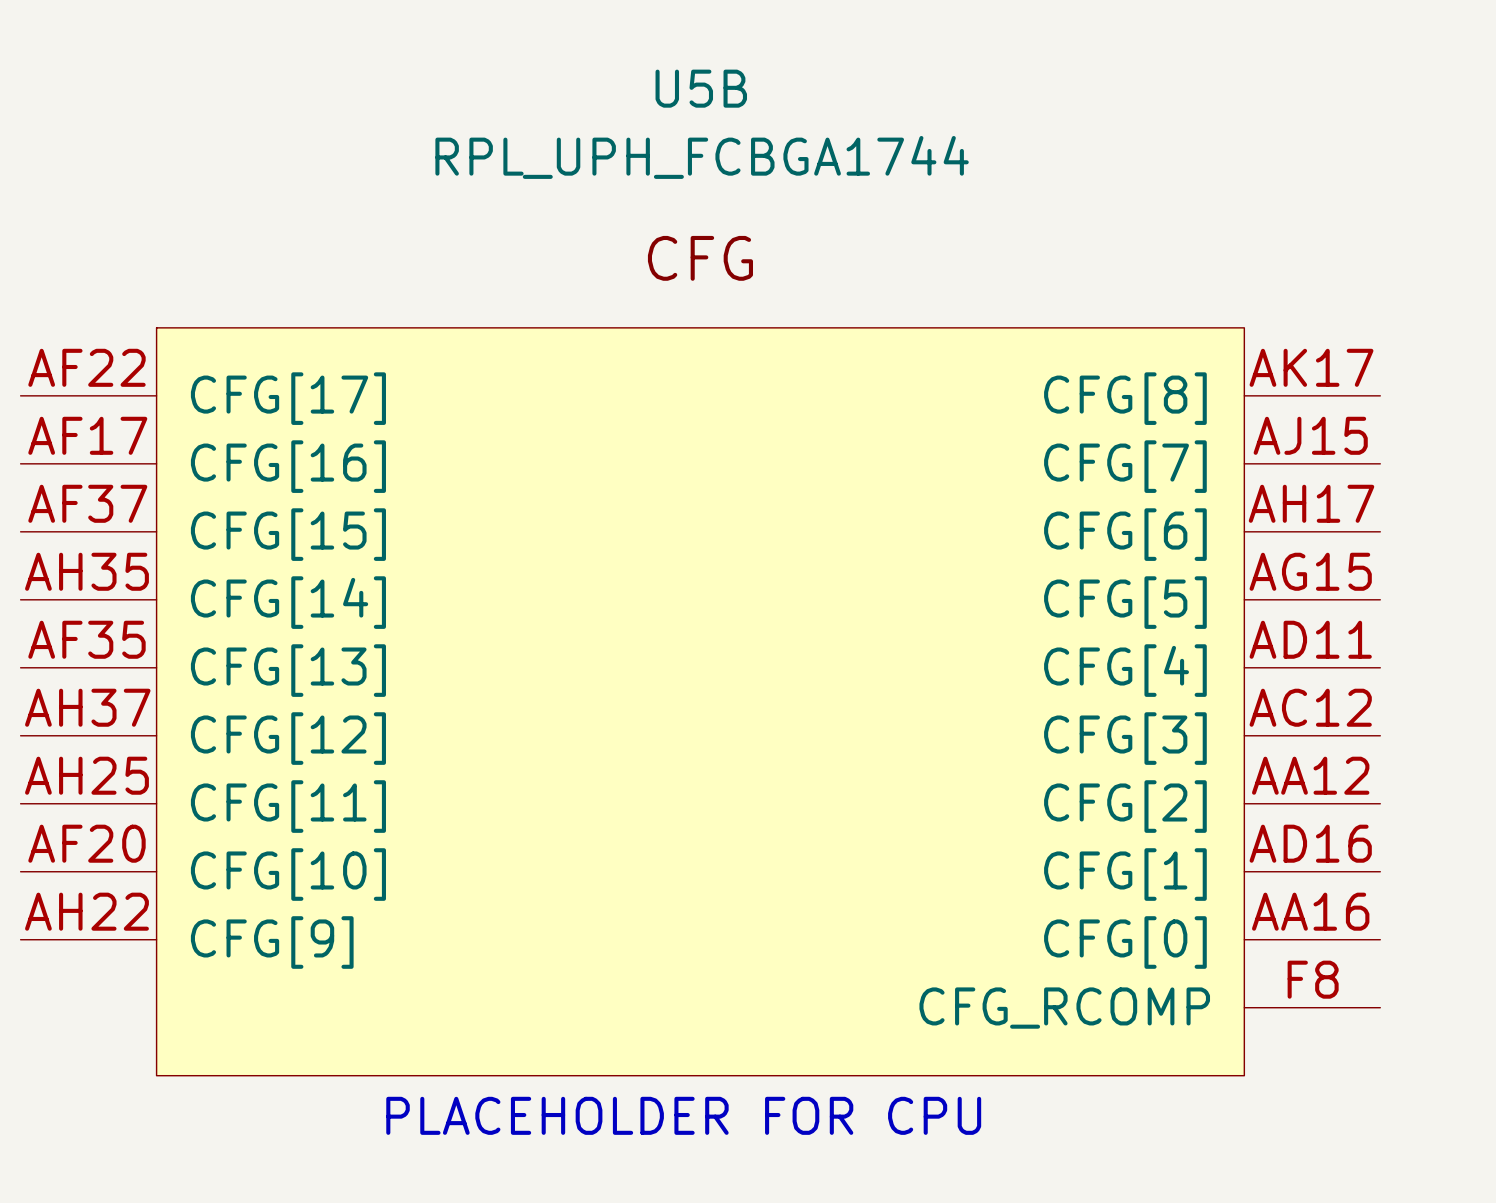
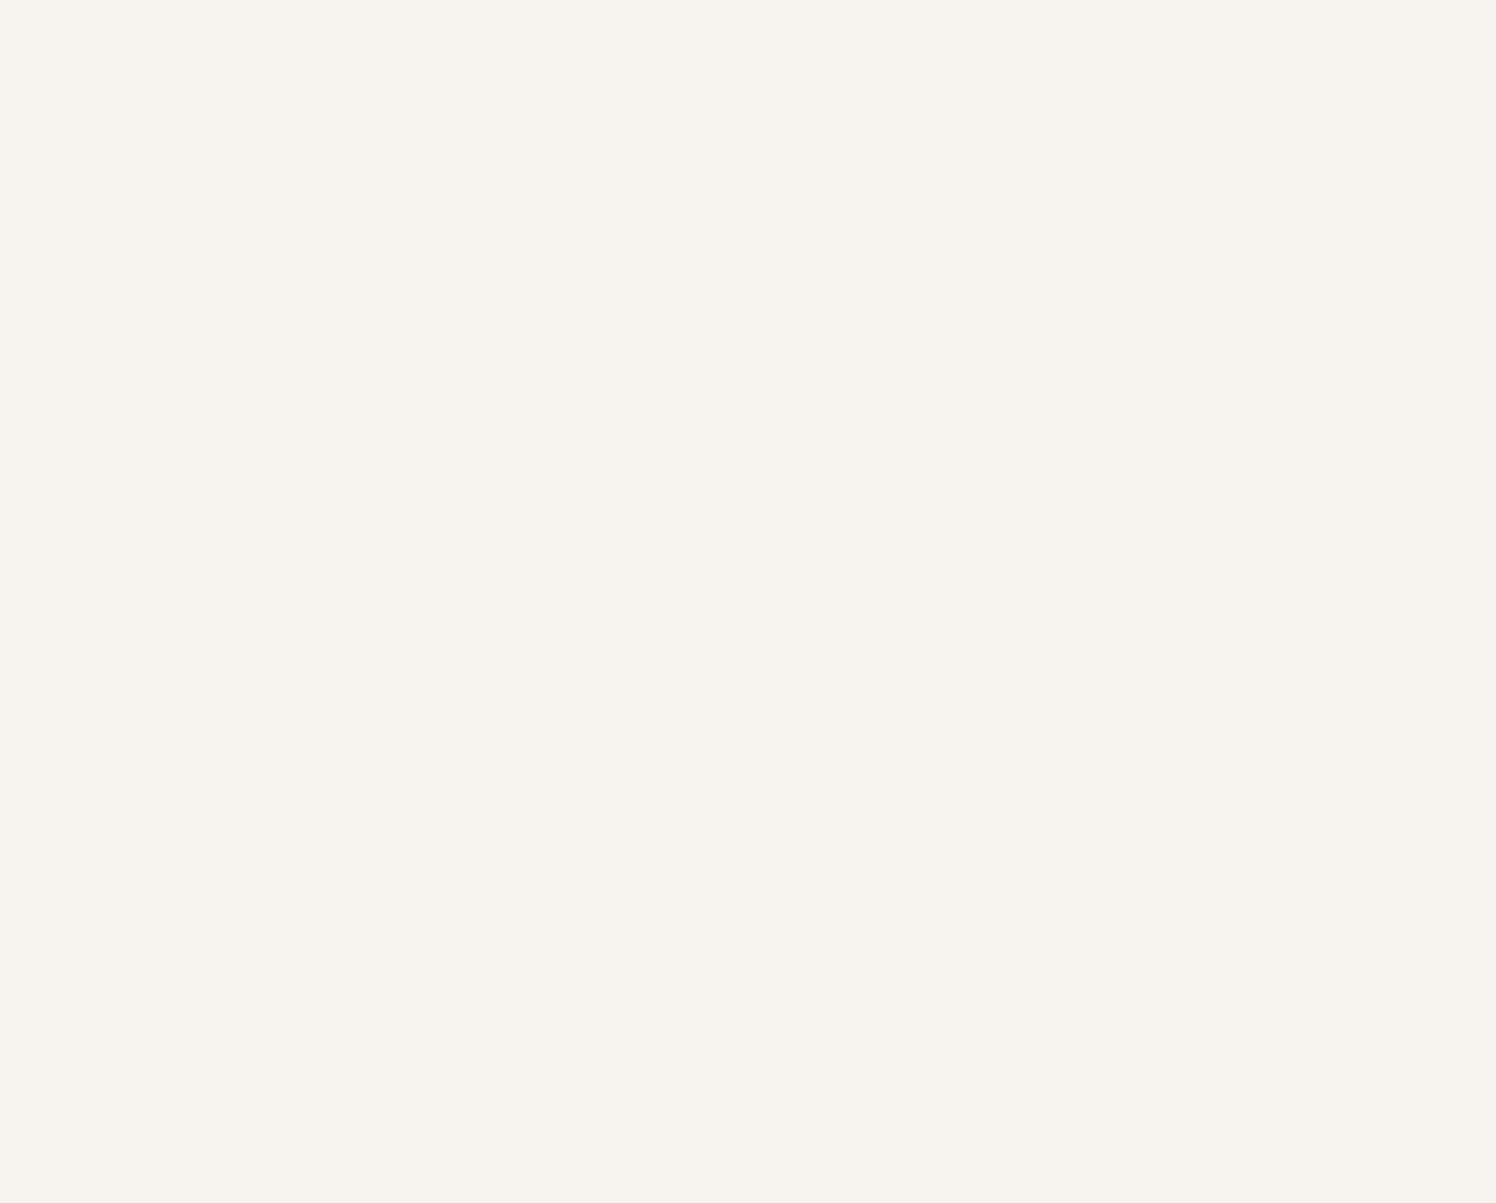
U5B: RPL_UPH_FCBGA1744 (700, 701) -> none
text: PLACEHOLDER FOR CPU (683, 1115) -> none

